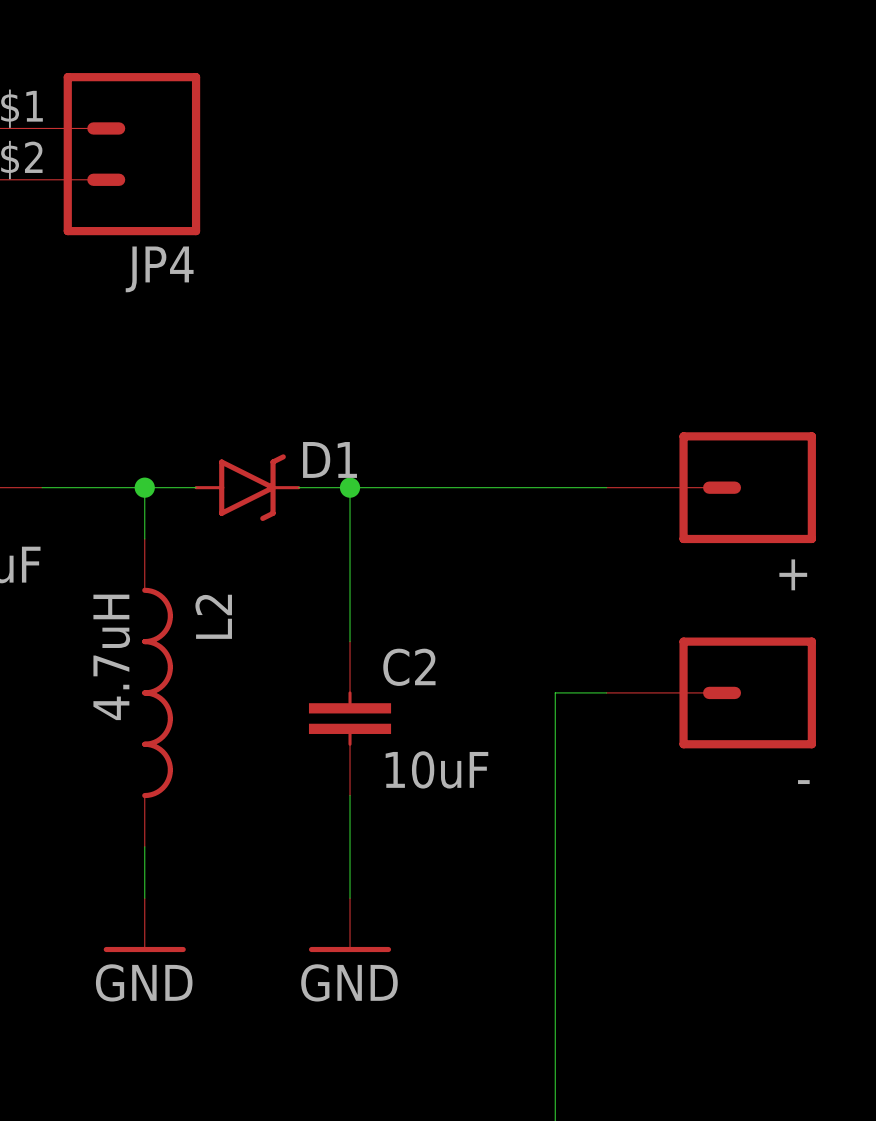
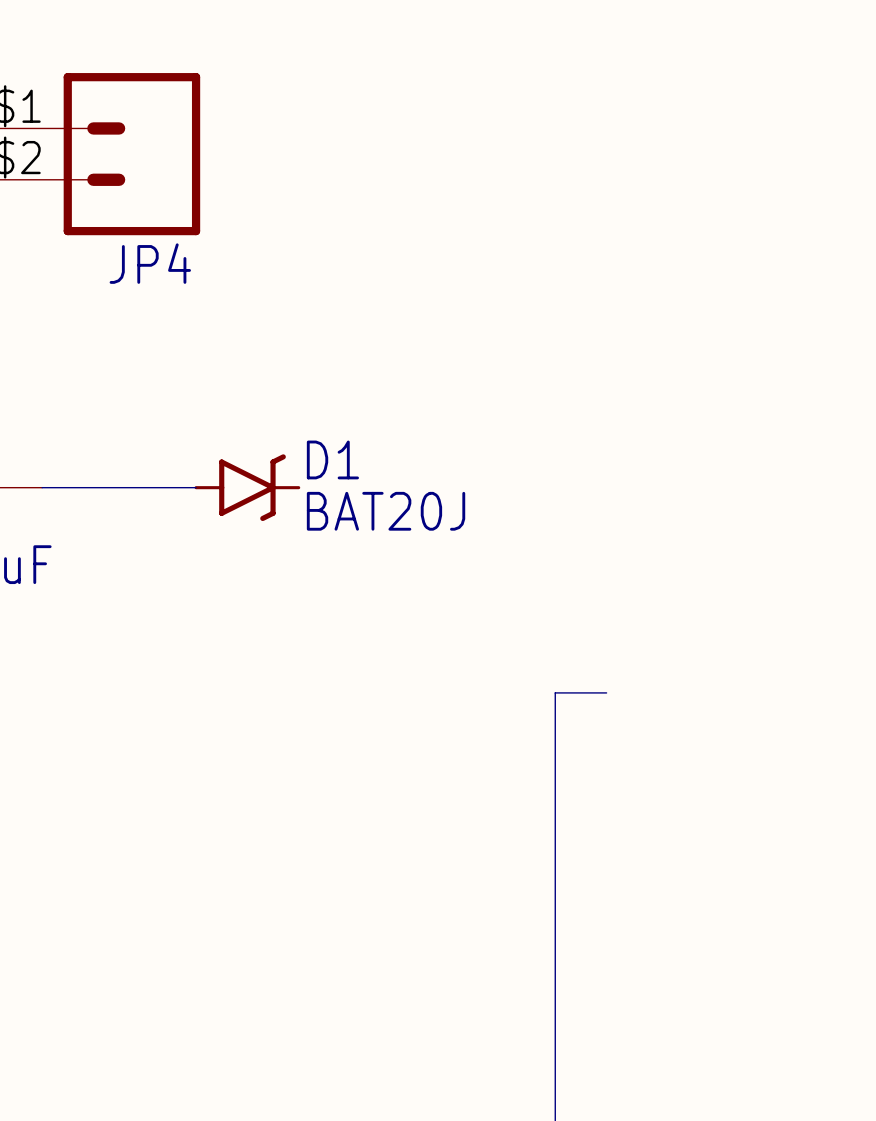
wire: (144, 487) (144, 538) -> none
junction: (144, 487) -> none
wire: (298, 487) (606, 487) -> none
wire: (350, 487) (350, 641) -> none
junction: (350, 487) -> none
part: (711, 487) -> none
D1 value: none -> BAT20J (386, 511)
L2: 4.7uH (157, 692) -> none
part: (711, 692) -> none
C2: 10uF (350, 718) -> none
wire: (350, 795) (350, 898) -> none
wire: (144, 846) (144, 898) -> none
power symbol: GND (144, 925) -> none
power symbol: GND (350, 925) -> none

